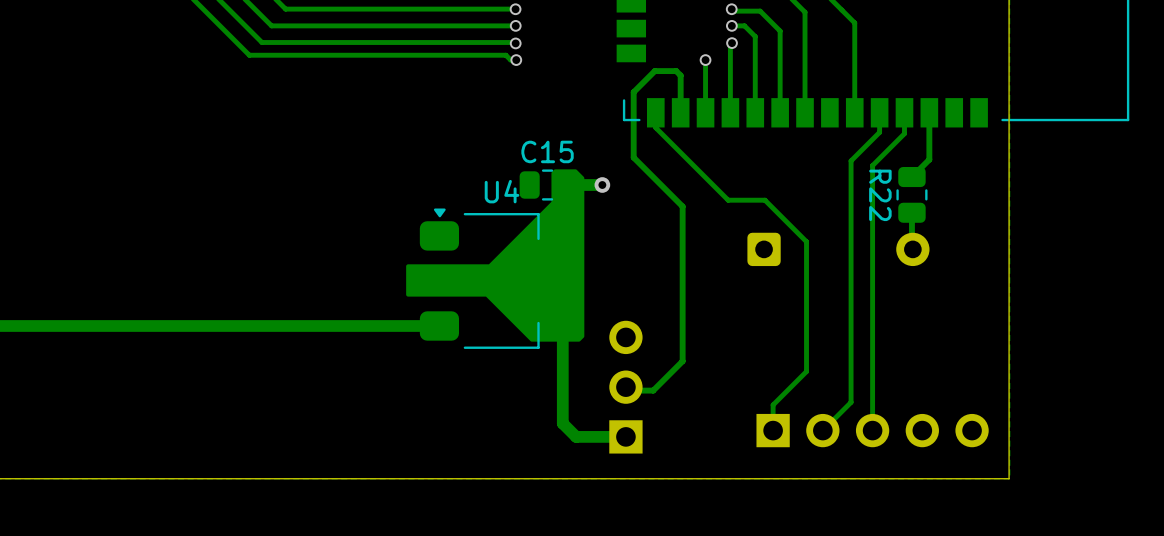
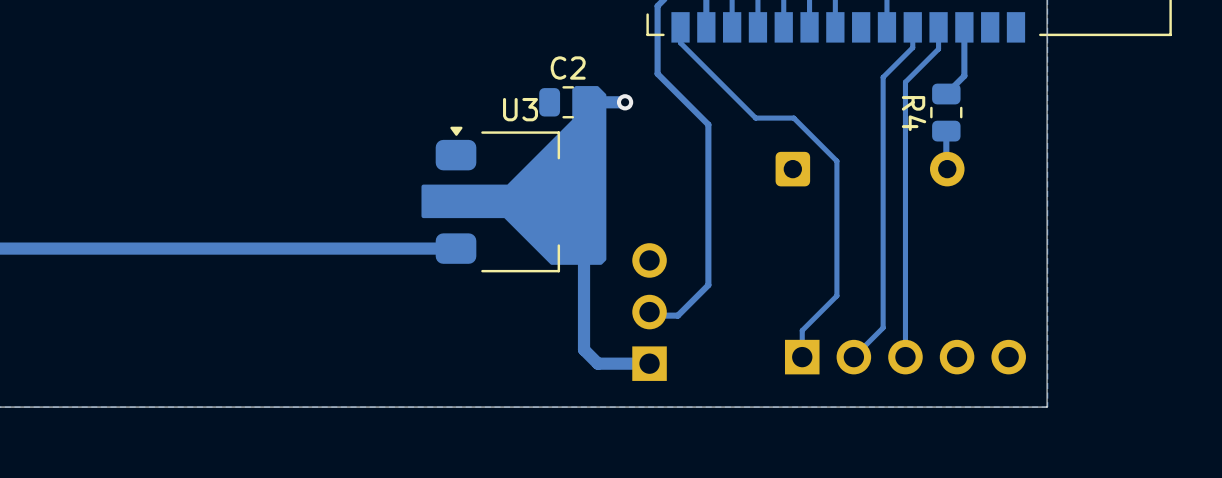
C15 name: C15 (547, 151) -> C2 (568, 68)
U4 name: U4 (502, 191) -> U3 (520, 109)
R22 name: R22 (880, 195) -> R4 (914, 113)

